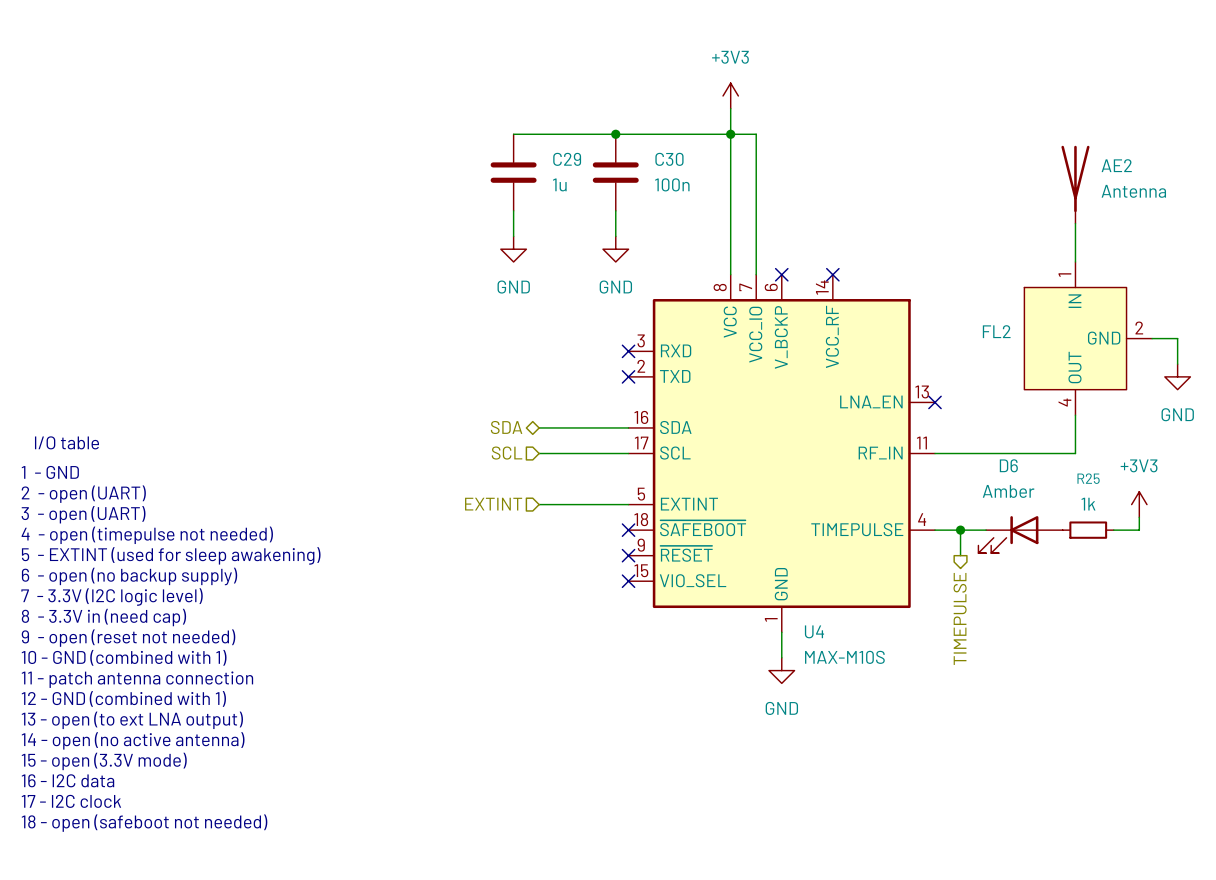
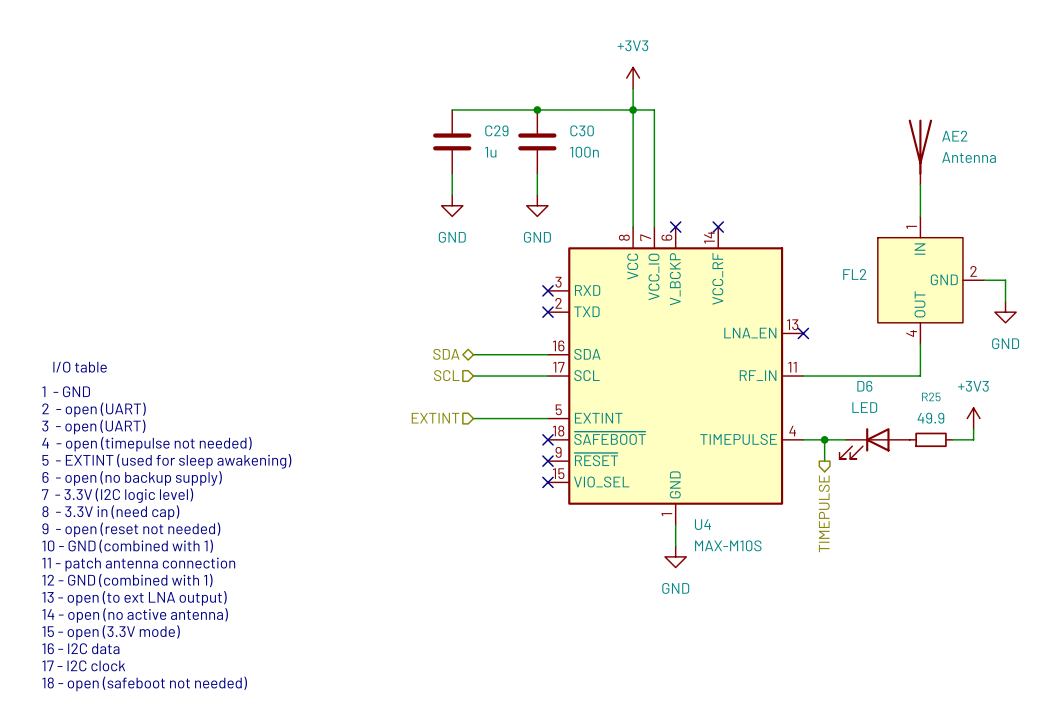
D6 value: Amber (1008, 491) -> LED (864, 407)
R25 value: 1k (1088, 504) -> 49.9 (930, 418)

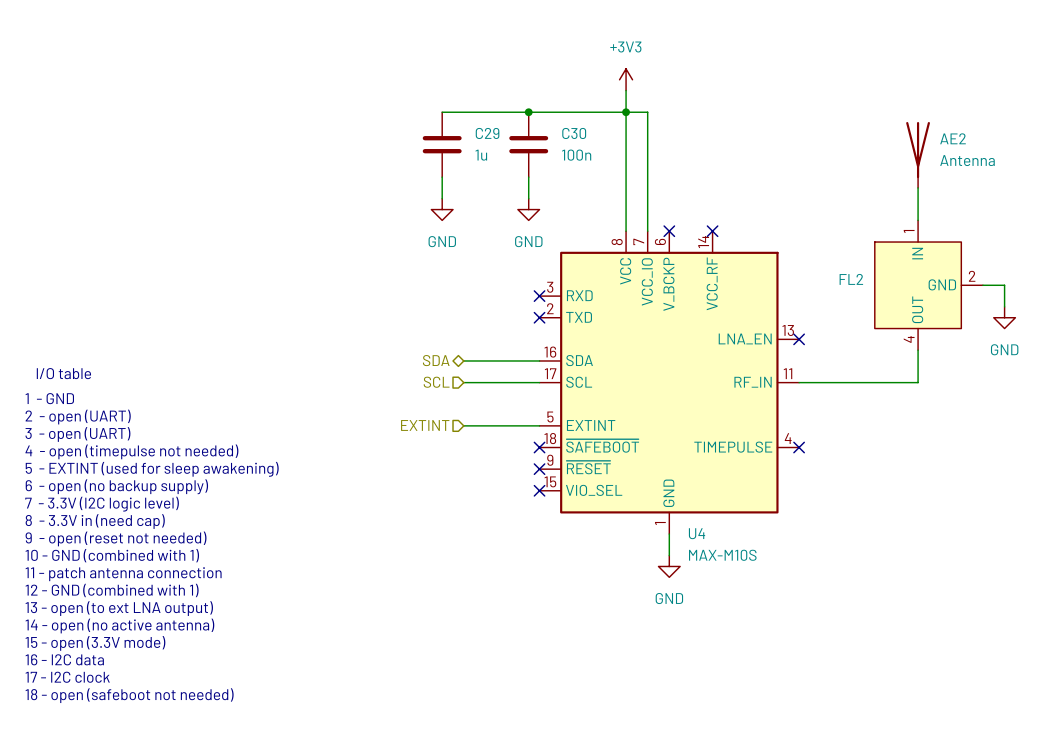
power symbol: +3V3 (973, 418) -> none
wire: (973, 429) (973, 439) (952, 439) -> none
wire: (803, 439) (845, 439) -> none
no-connect mark: none -> (799, 447)
wire: (824, 439) (824, 461) -> none
junction: (824, 439) -> none
R25: 49.9 (931, 439) -> none
D6: LED (874, 443) -> none
hierarchical label: TIMEPULSE (824, 513) -> none

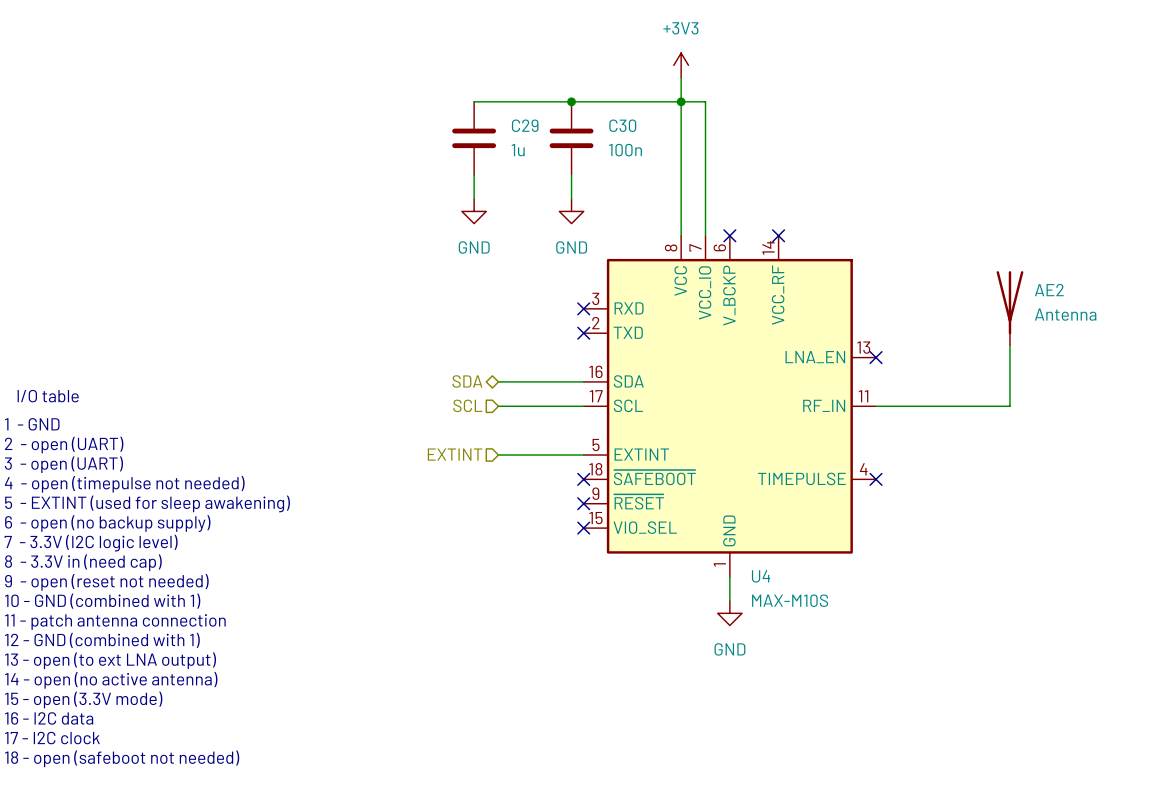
AE2 position: (918, 154) -> (1009, 308)
wire: (918, 187) (918, 220) -> none
FL2: (928, 285) -> none
wire: (982, 285) (1004, 285) (1004, 306) -> none
power symbol: GND (1004, 317) -> none

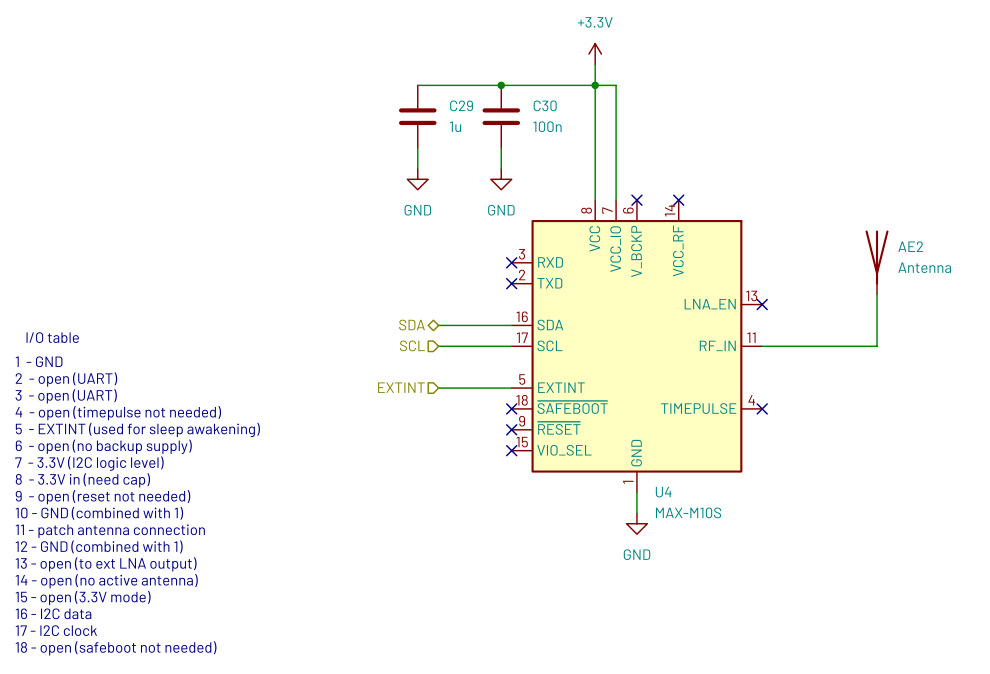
power symbol: +3V3 (681, 65) -> +3.3V (595, 54)

